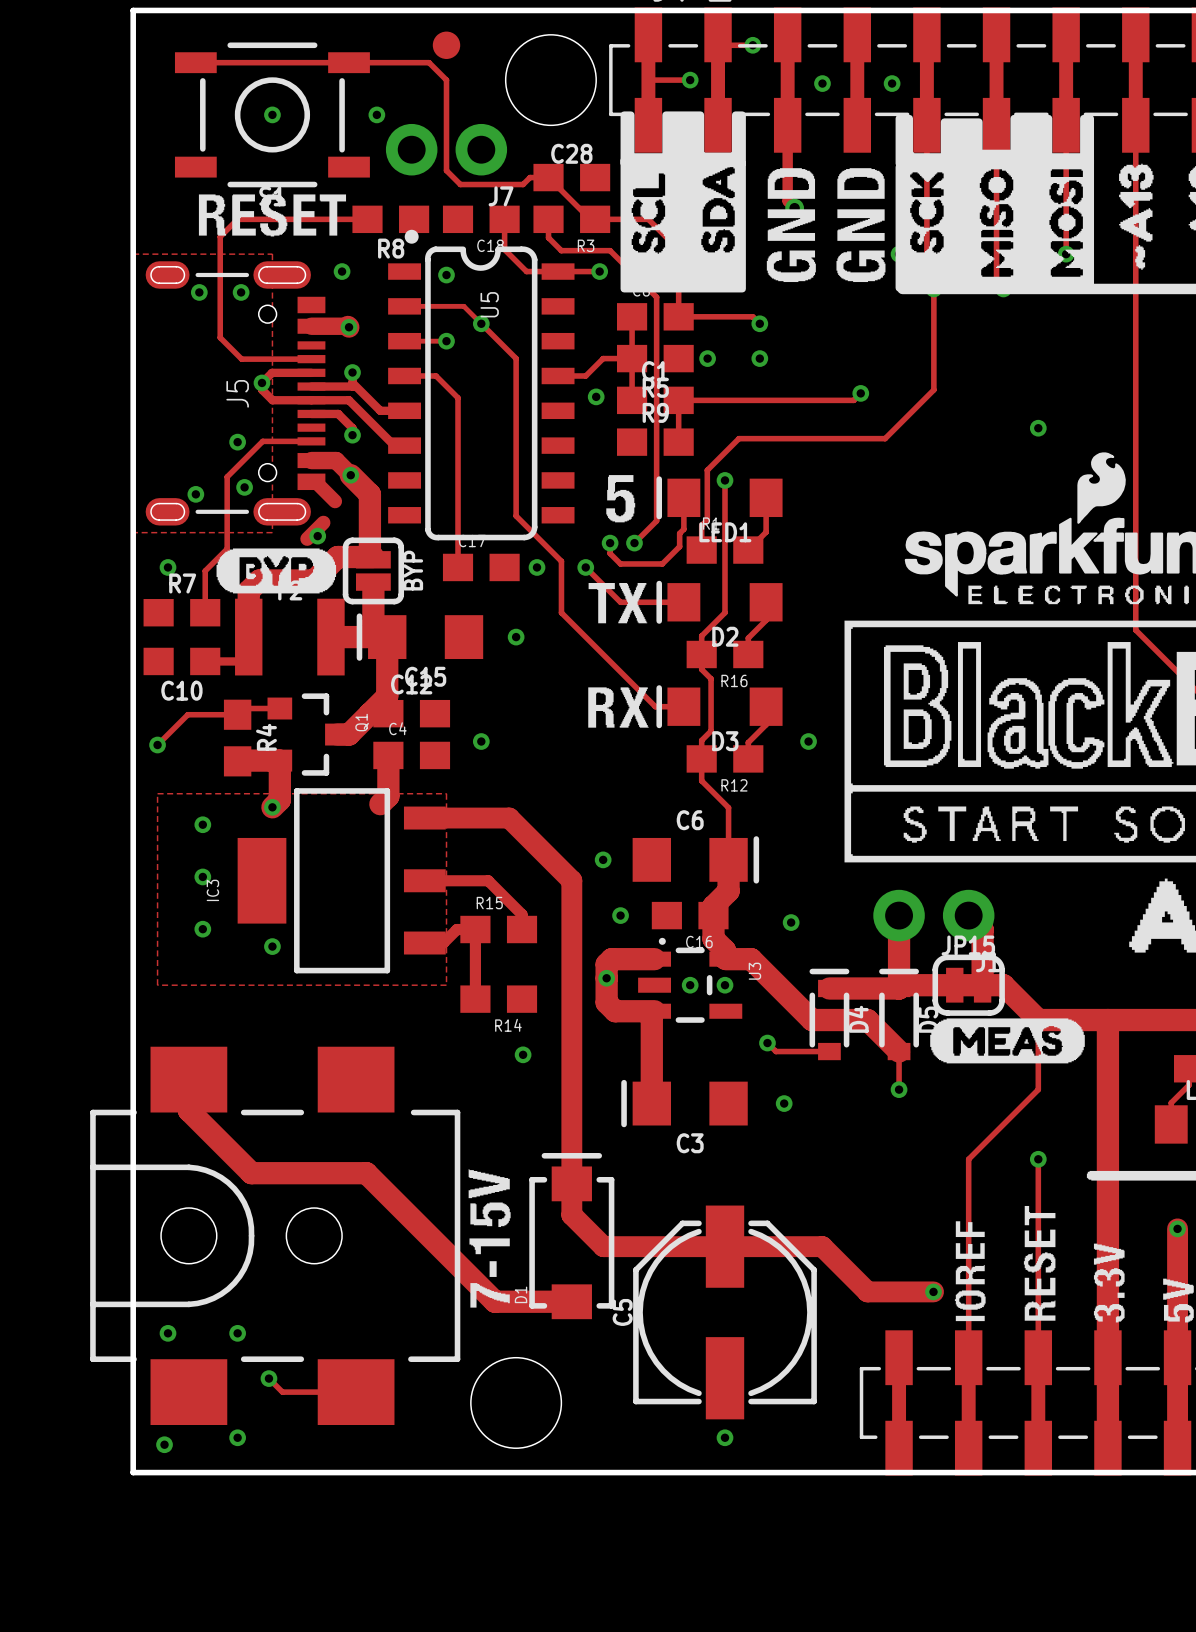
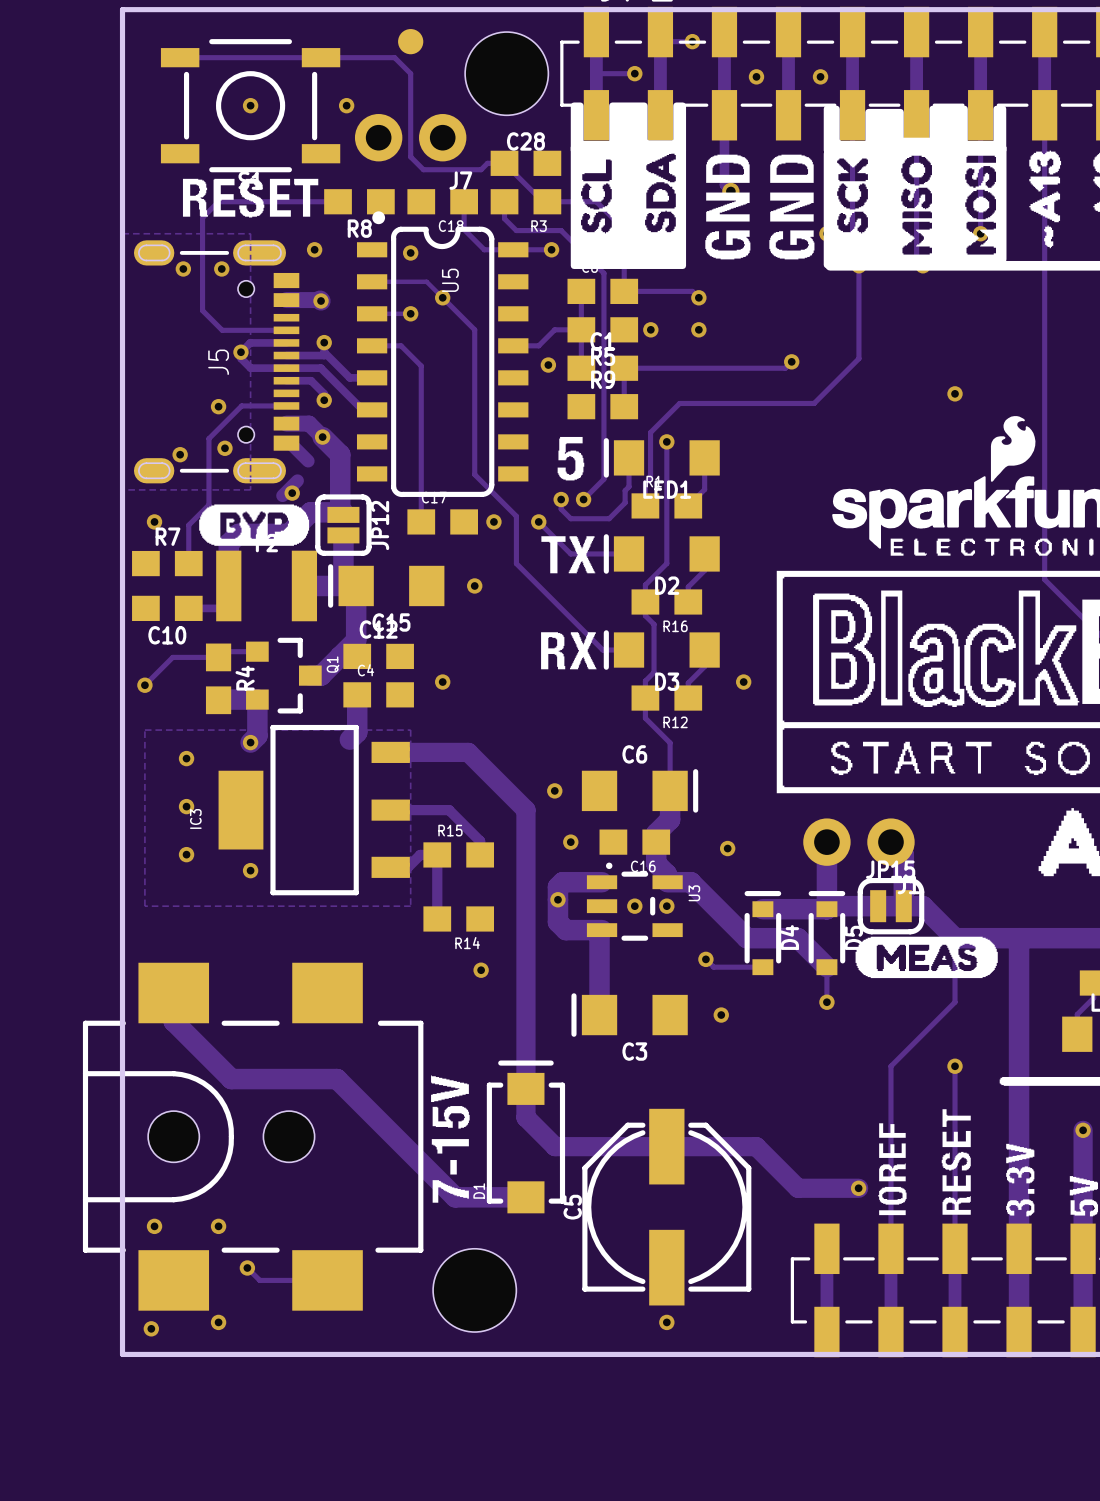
BYP name: BYP (413, 570) -> JP12 (379, 525)

